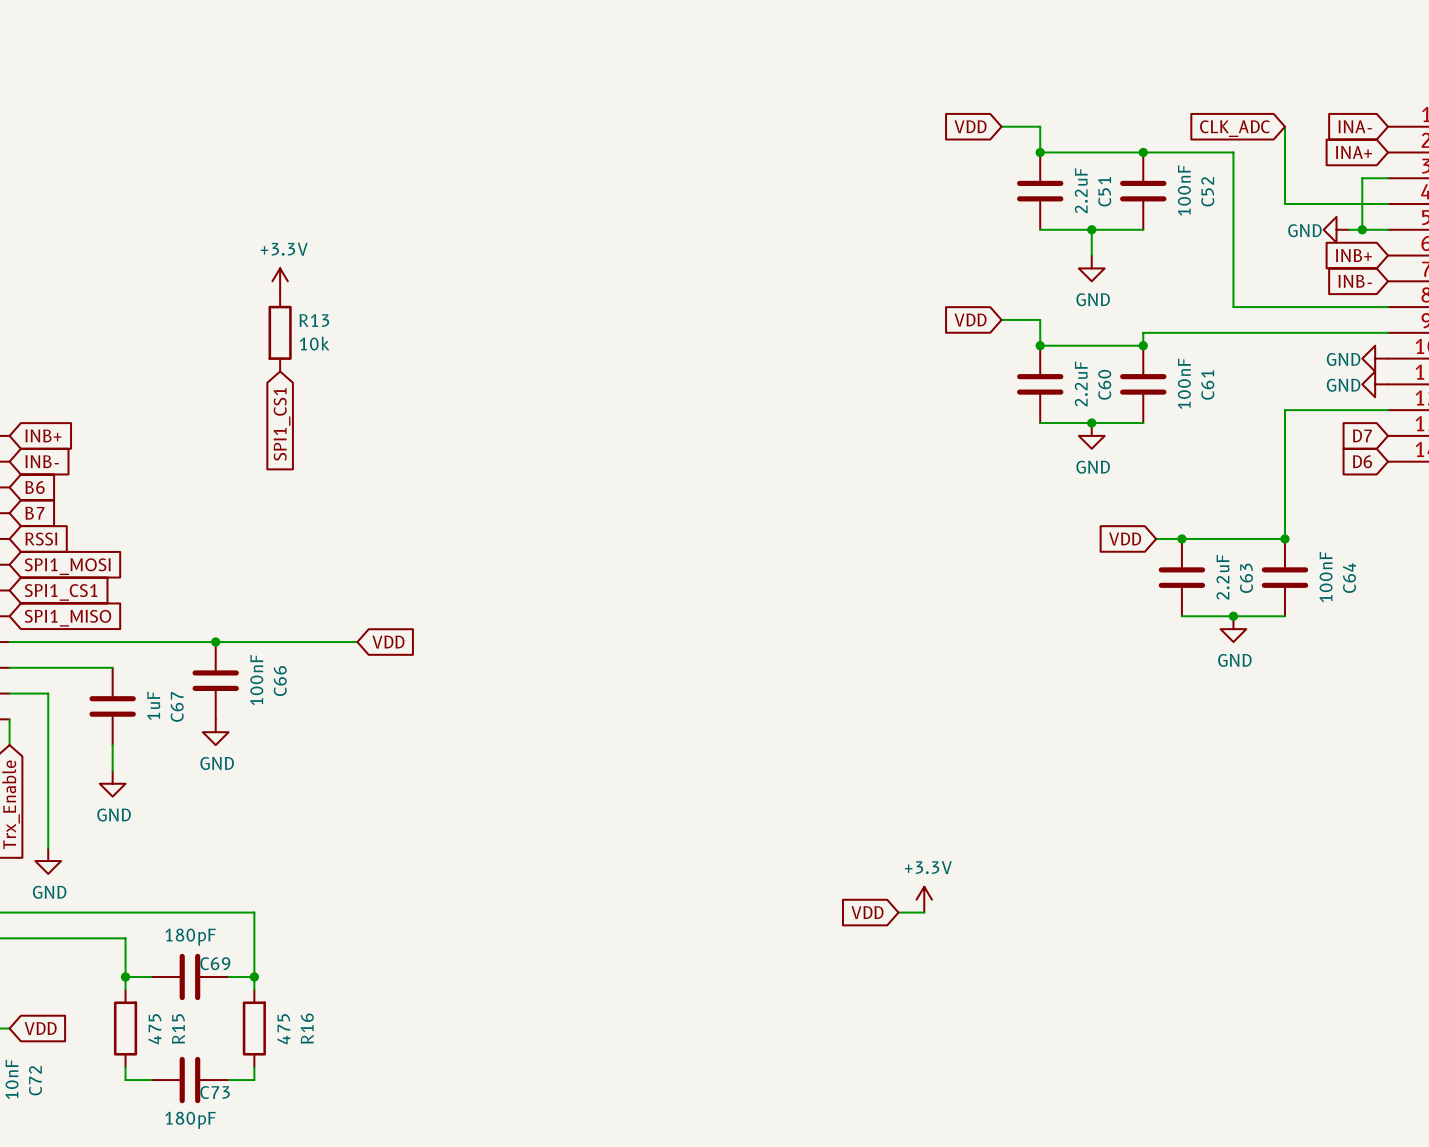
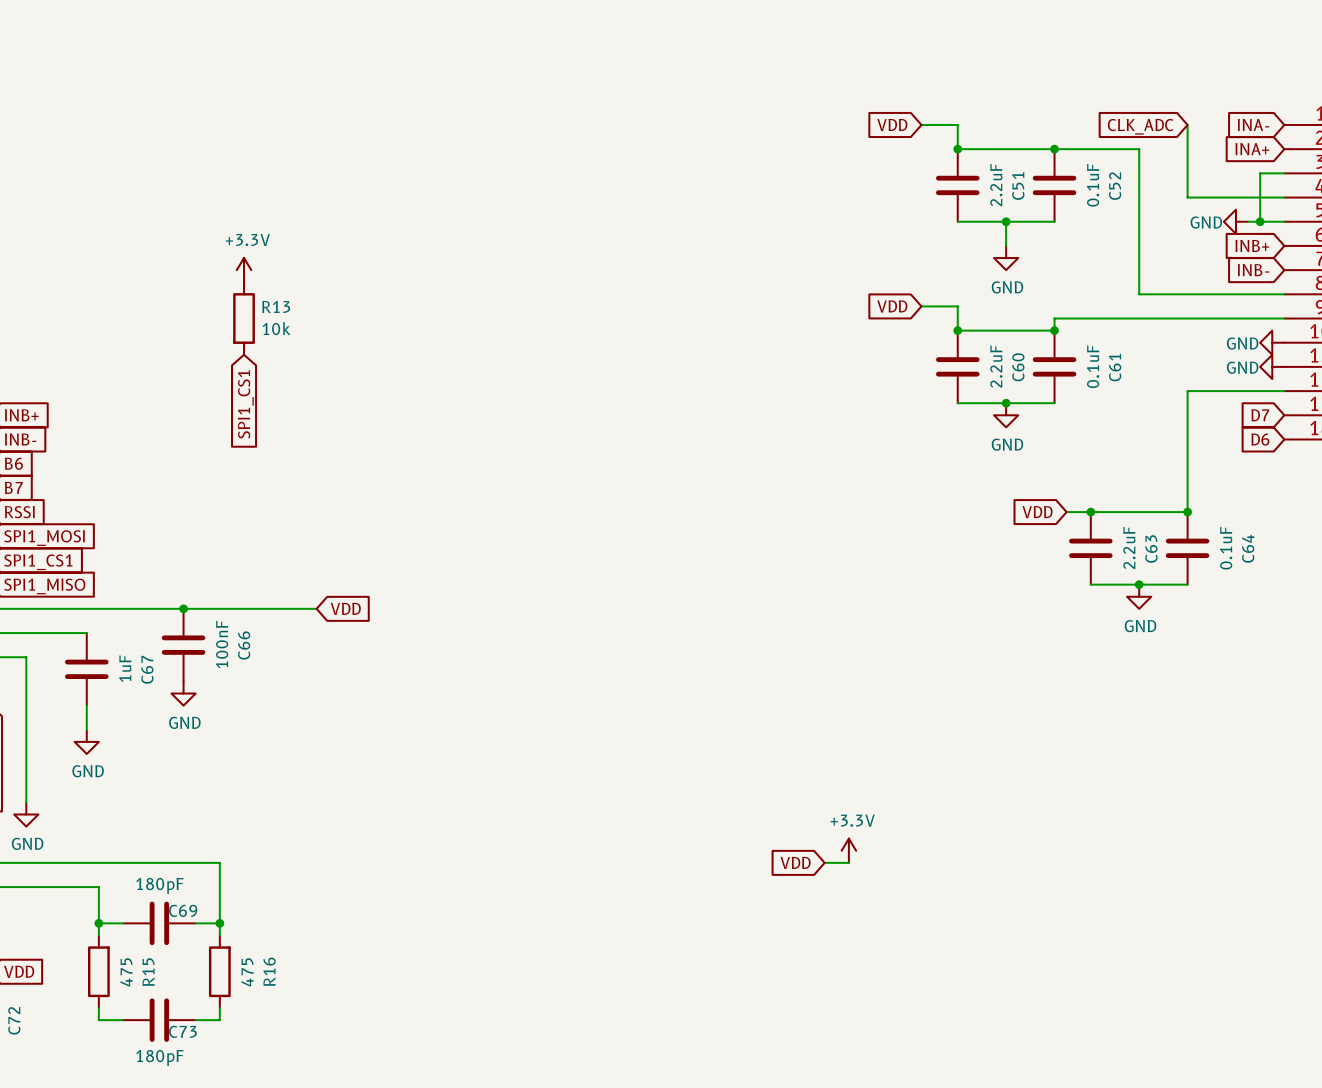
C52 value: 100nF (1184, 190) -> 0.1uF (1093, 185)
C61 value: 100nF (1184, 383) -> 0.1uF (1093, 366)
C64 value: 100nF (1326, 577) -> 0.1uF (1226, 548)

